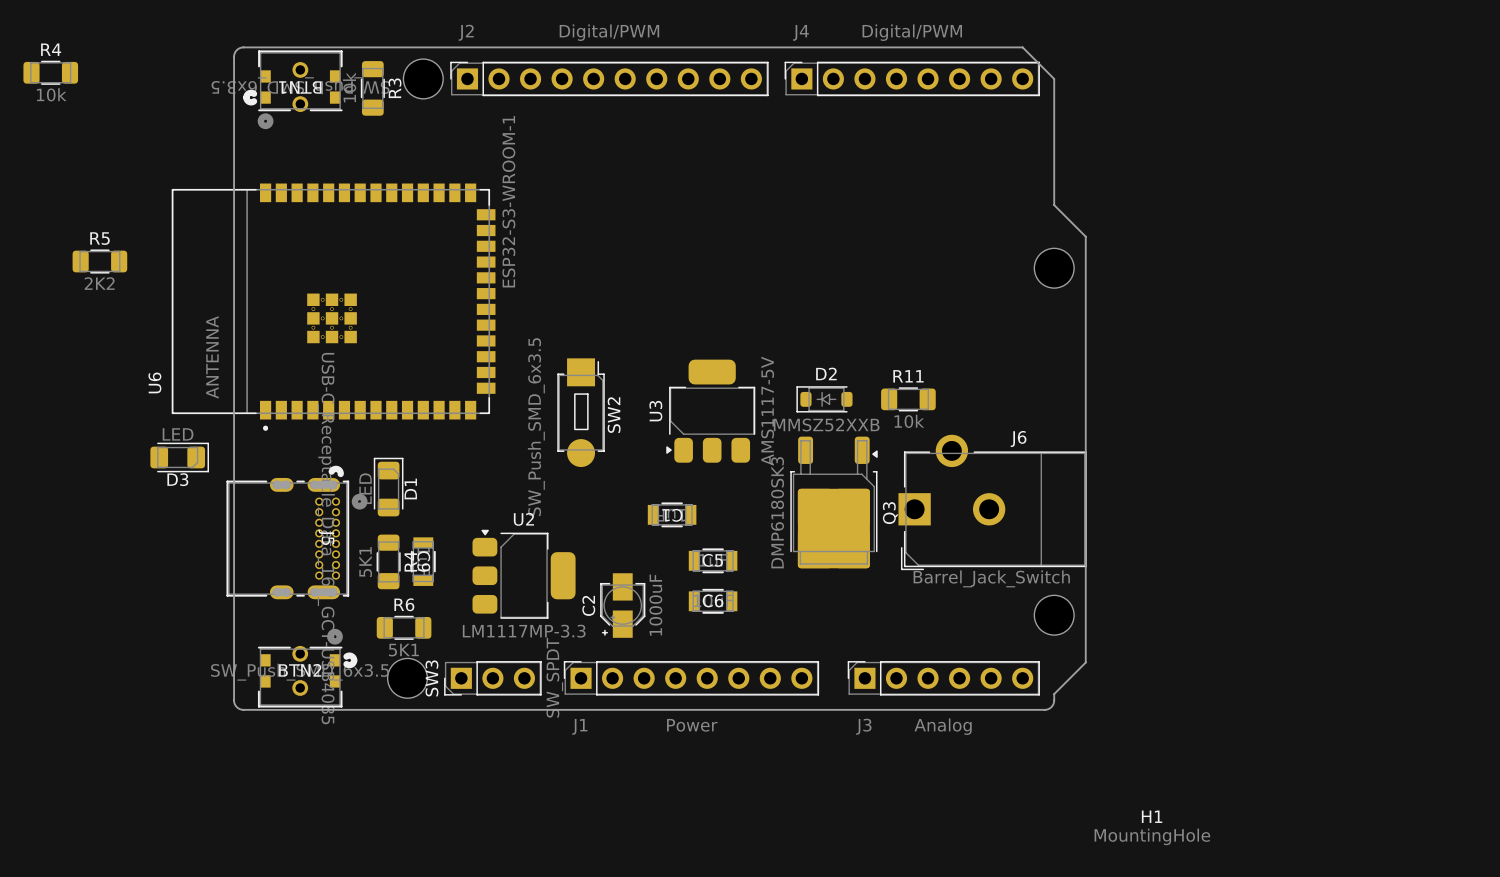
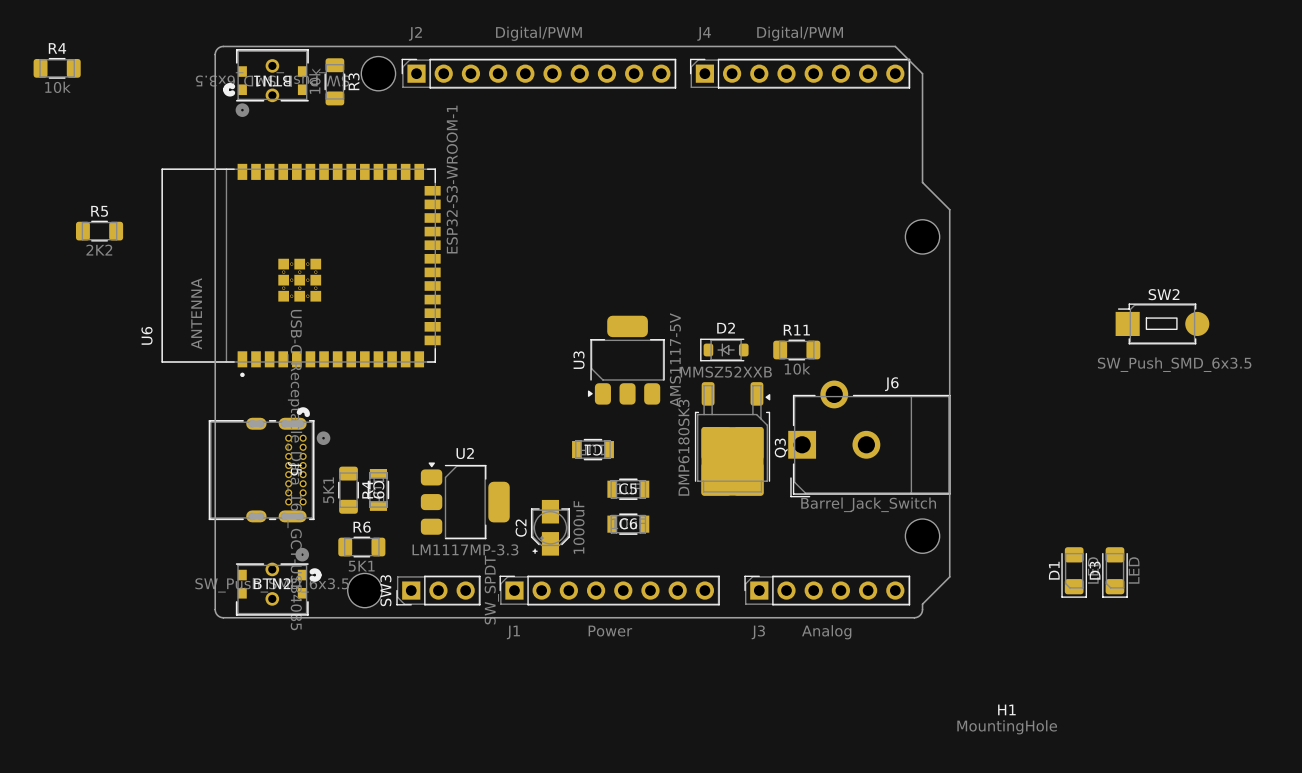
SW2 rotation: 0° (581, 412) -> 90° counterclockwise (1162, 323)
SW2 position: (581, 412) -> (1162, 323)
D3 rotation: 0° (179, 457) -> 90° clockwise (1114, 572)
D3 position: (179, 457) -> (1114, 572)
D1 rotation: 0° (388, 487) -> 180° (1074, 572)
D1 position: (388, 487) -> (1074, 572)

